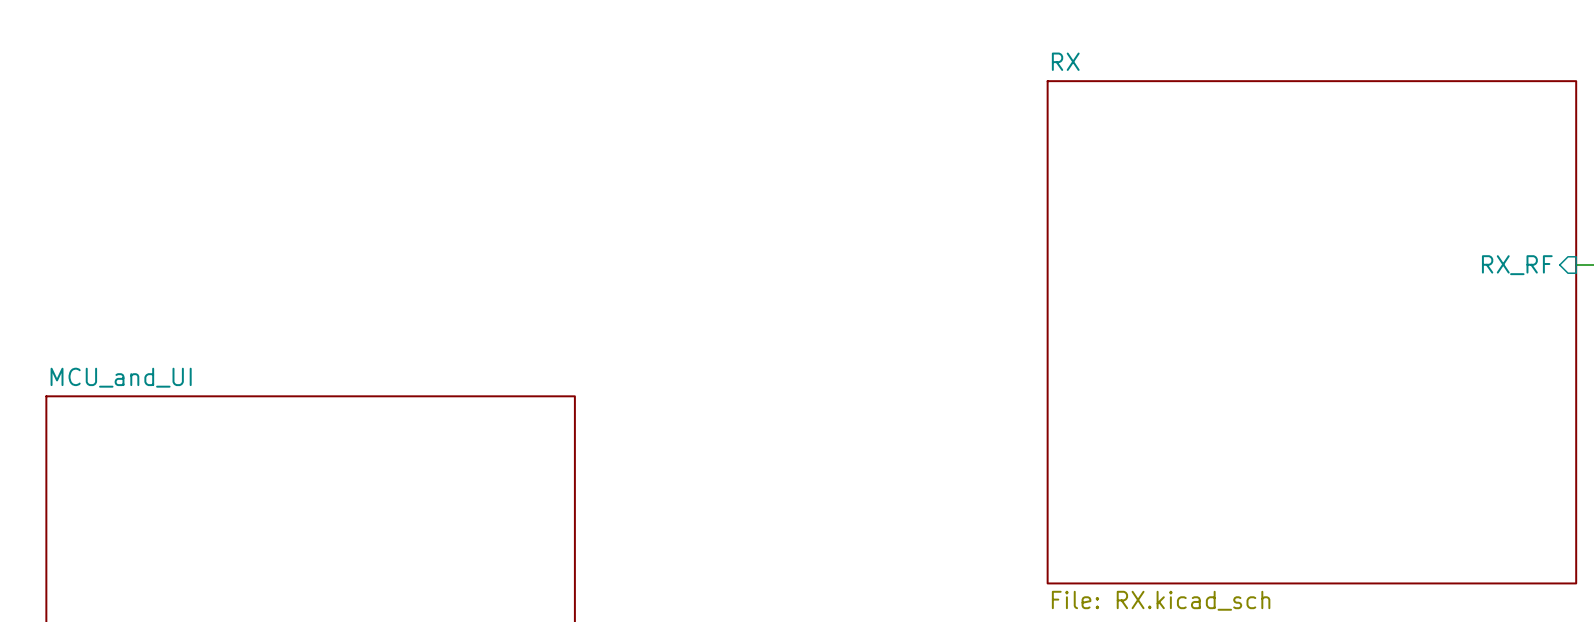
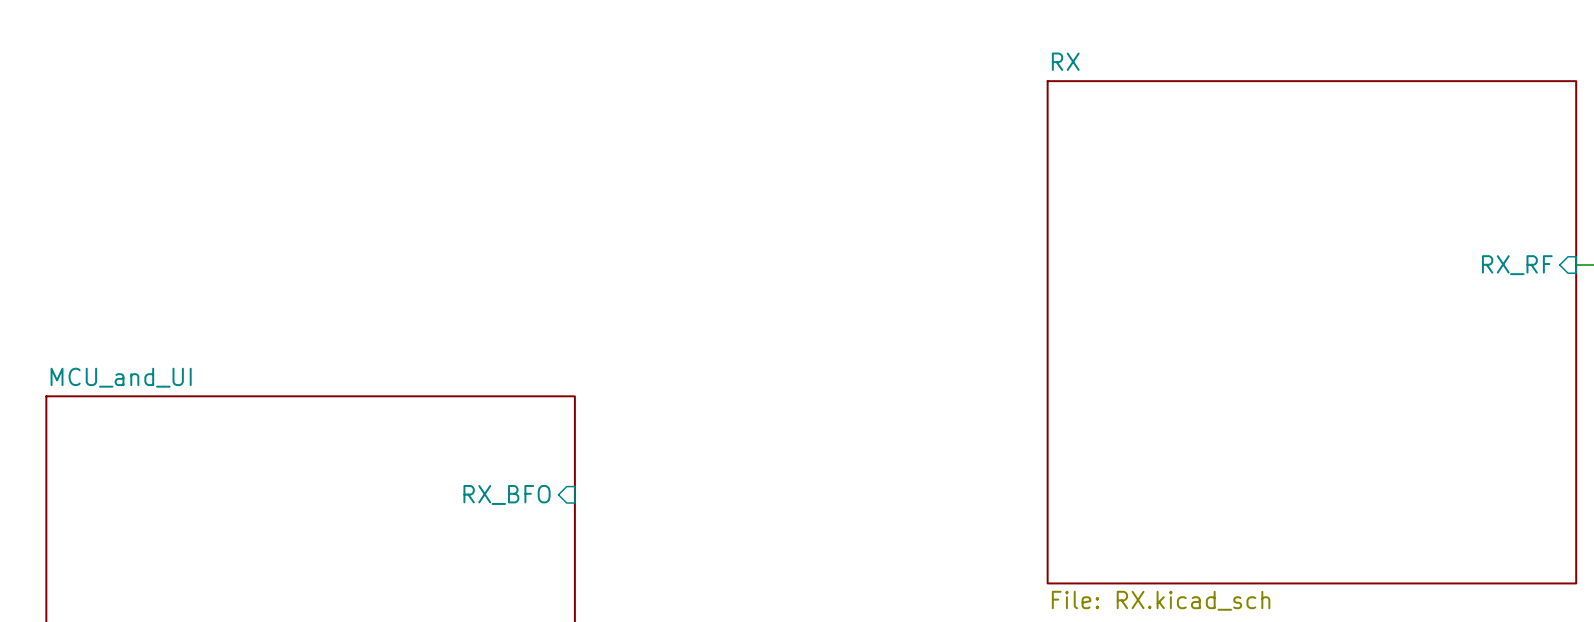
sheet pin: none -> RX_BFO (507, 494)

